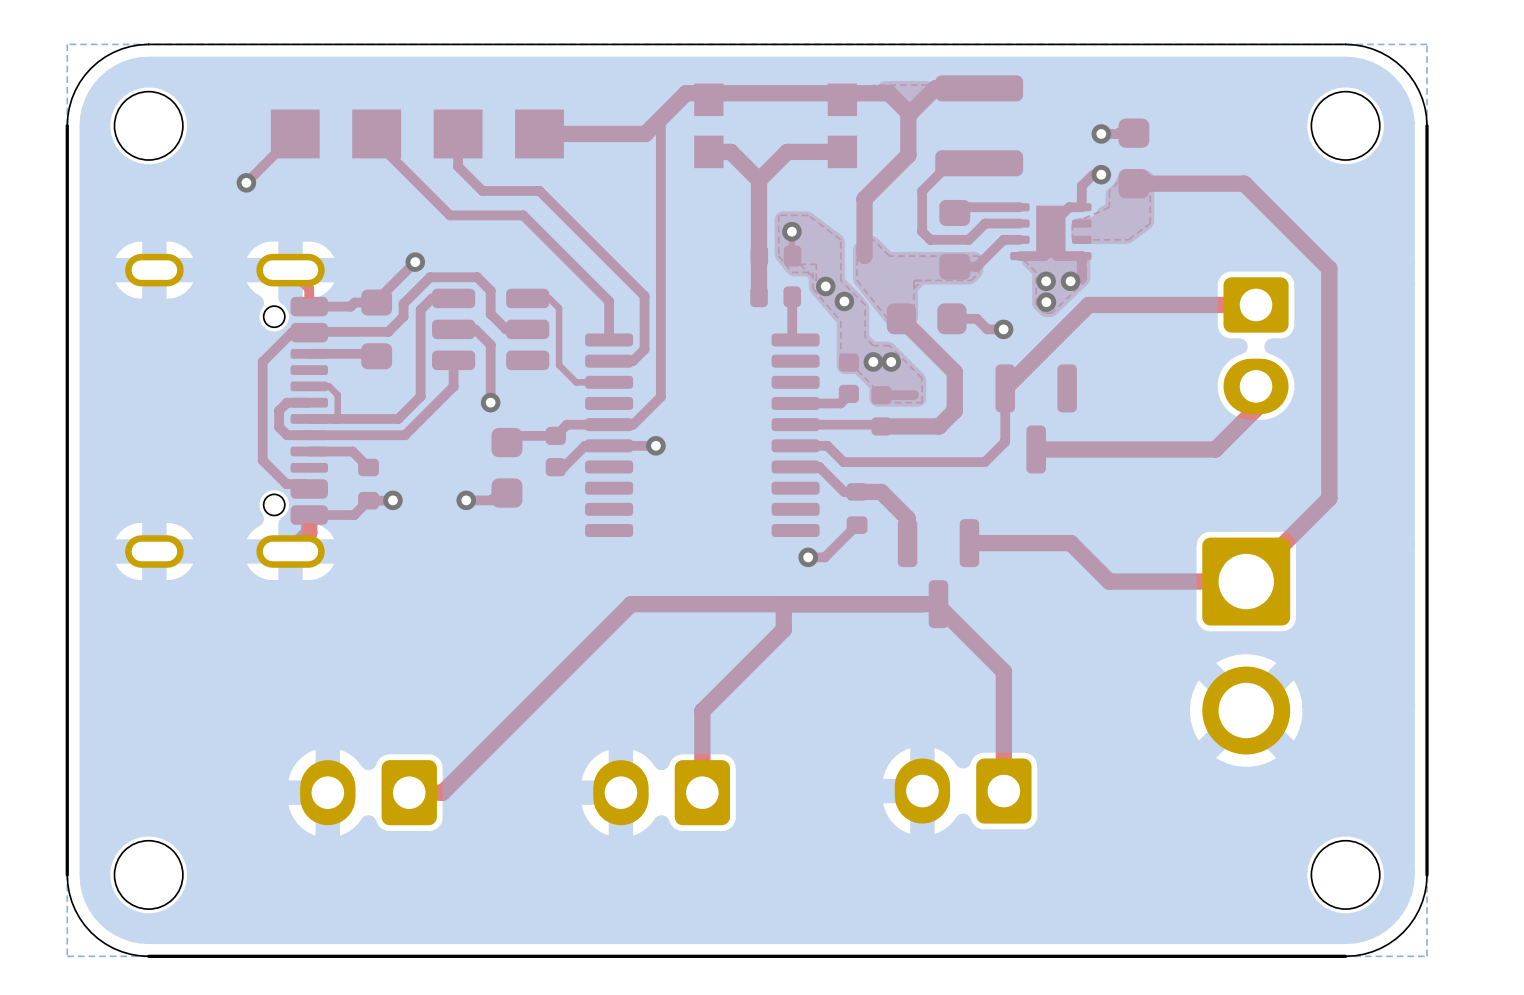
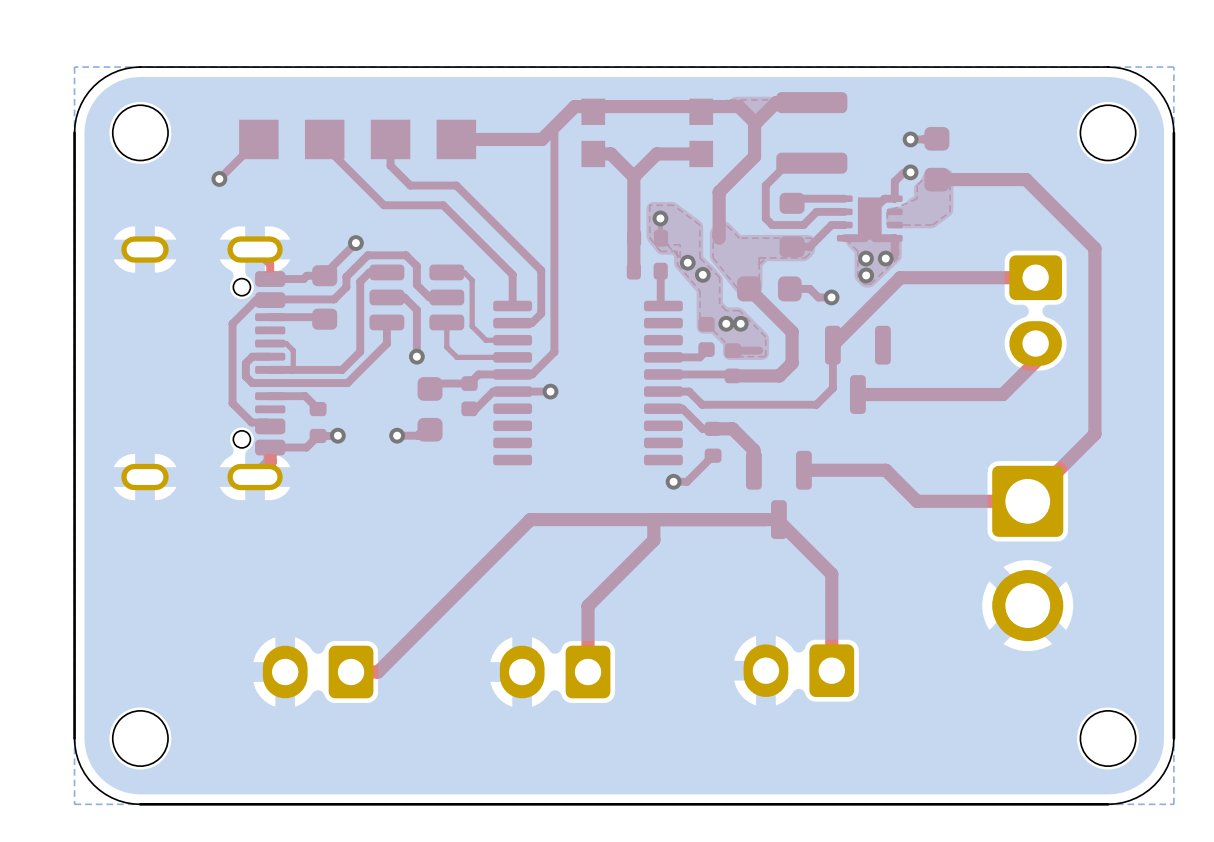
top track: none -> (446, 322) (446, 347) (457, 357) (512, 357)

